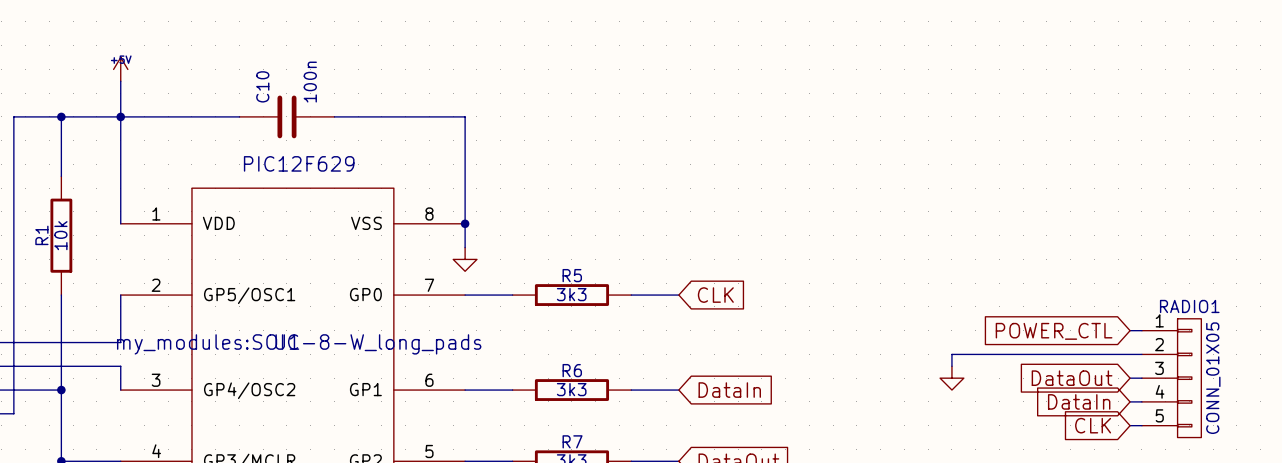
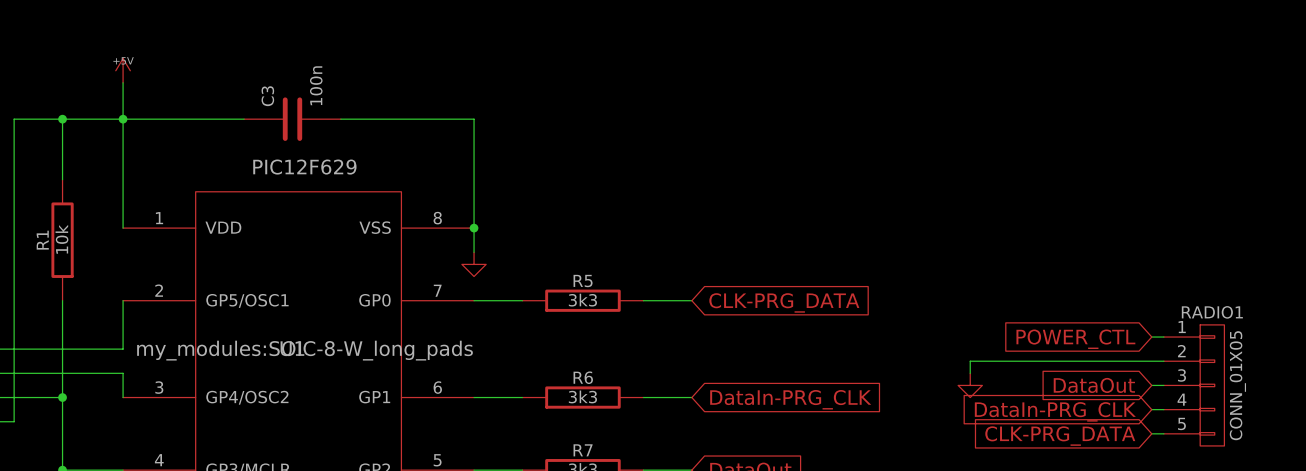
C10 name: C10 (262, 86) -> C3 (267, 96)
global label: CLK (715, 295) -> CLK-PRG_DATA (784, 302)
global label: DataIn (729, 390) -> DataIn-PRG_CLK (790, 399)
global label: DataIn (1079, 401) -> DataIn-PRG_CLK (1055, 411)
global label: CLK (1093, 425) -> CLK-PRG_DATA (1060, 436)

